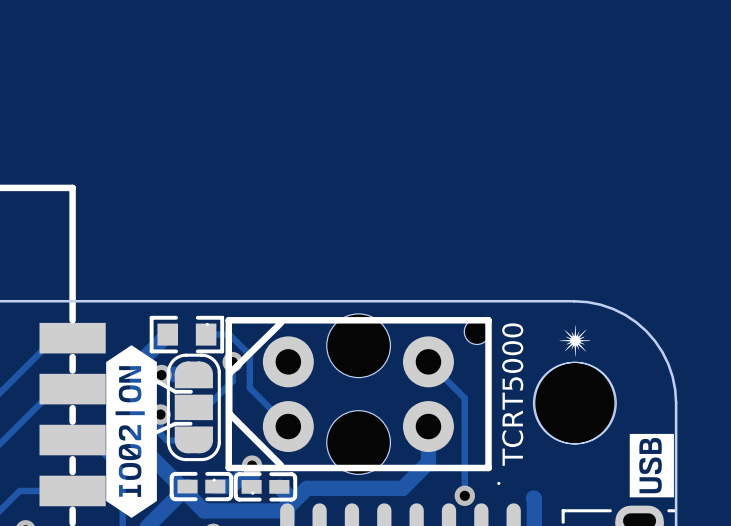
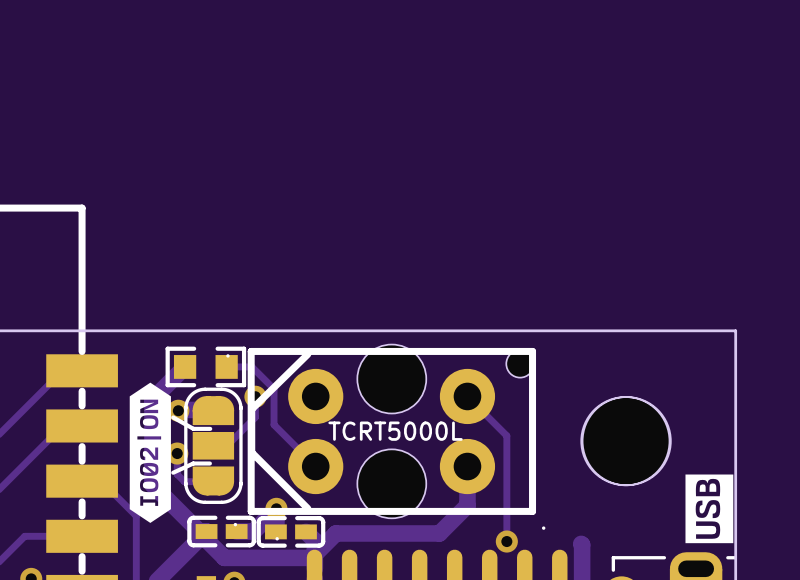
board edge: (574, 301) (587, 302) (613, 309) (636, 322) (646, 331) (662, 352) (668, 364) (675, 389) (676, 403) -> (625, 330) (735, 330) (735, 441)
drawing: [559, 325, 591, 357] -> none
drawing shape: [106, 345, 157, 518] -> [129, 382, 171, 523]
part value: TCRT5000 (512, 394) -> TCRT5000L (395, 431)

